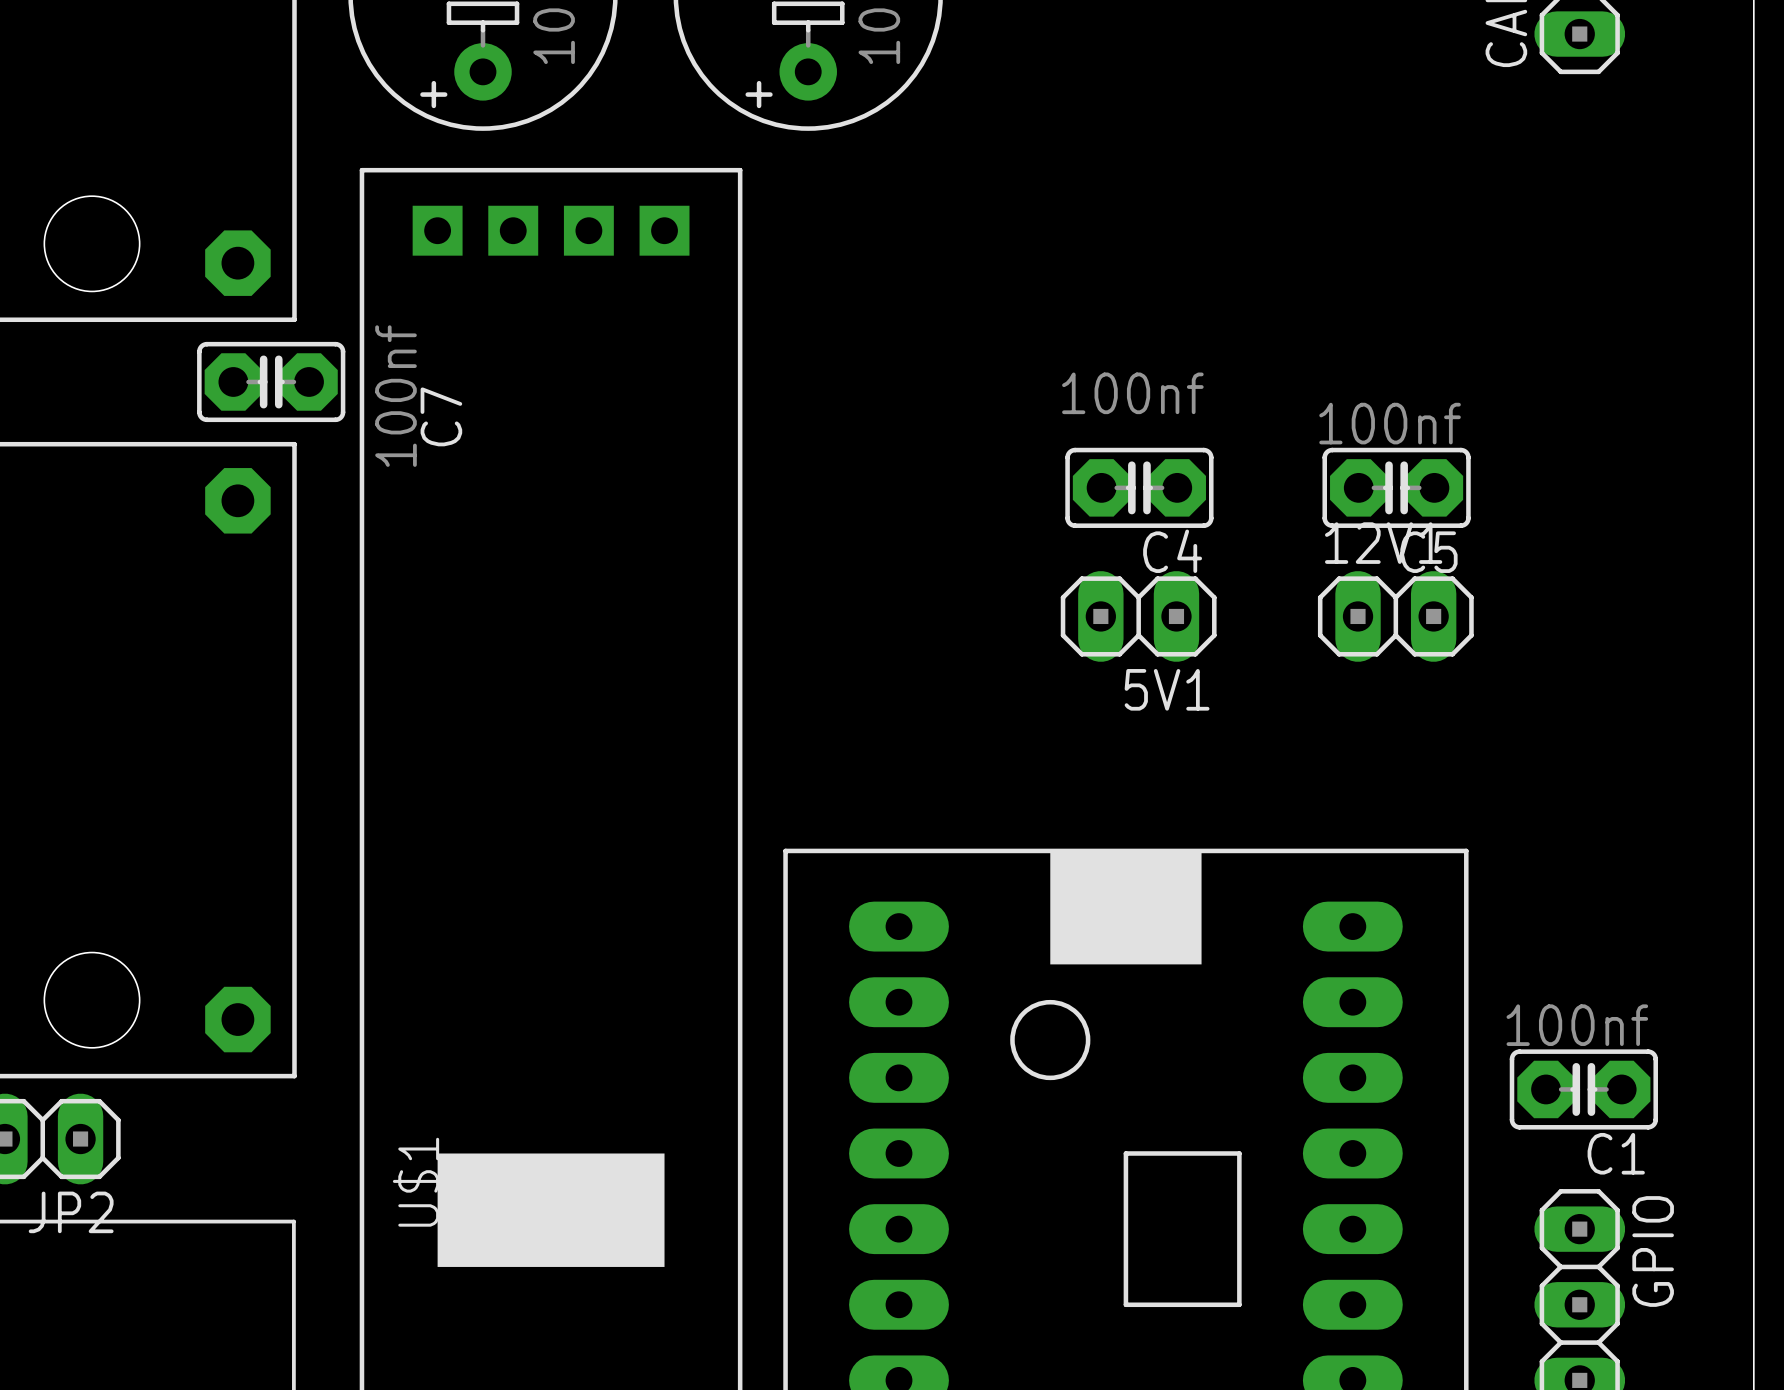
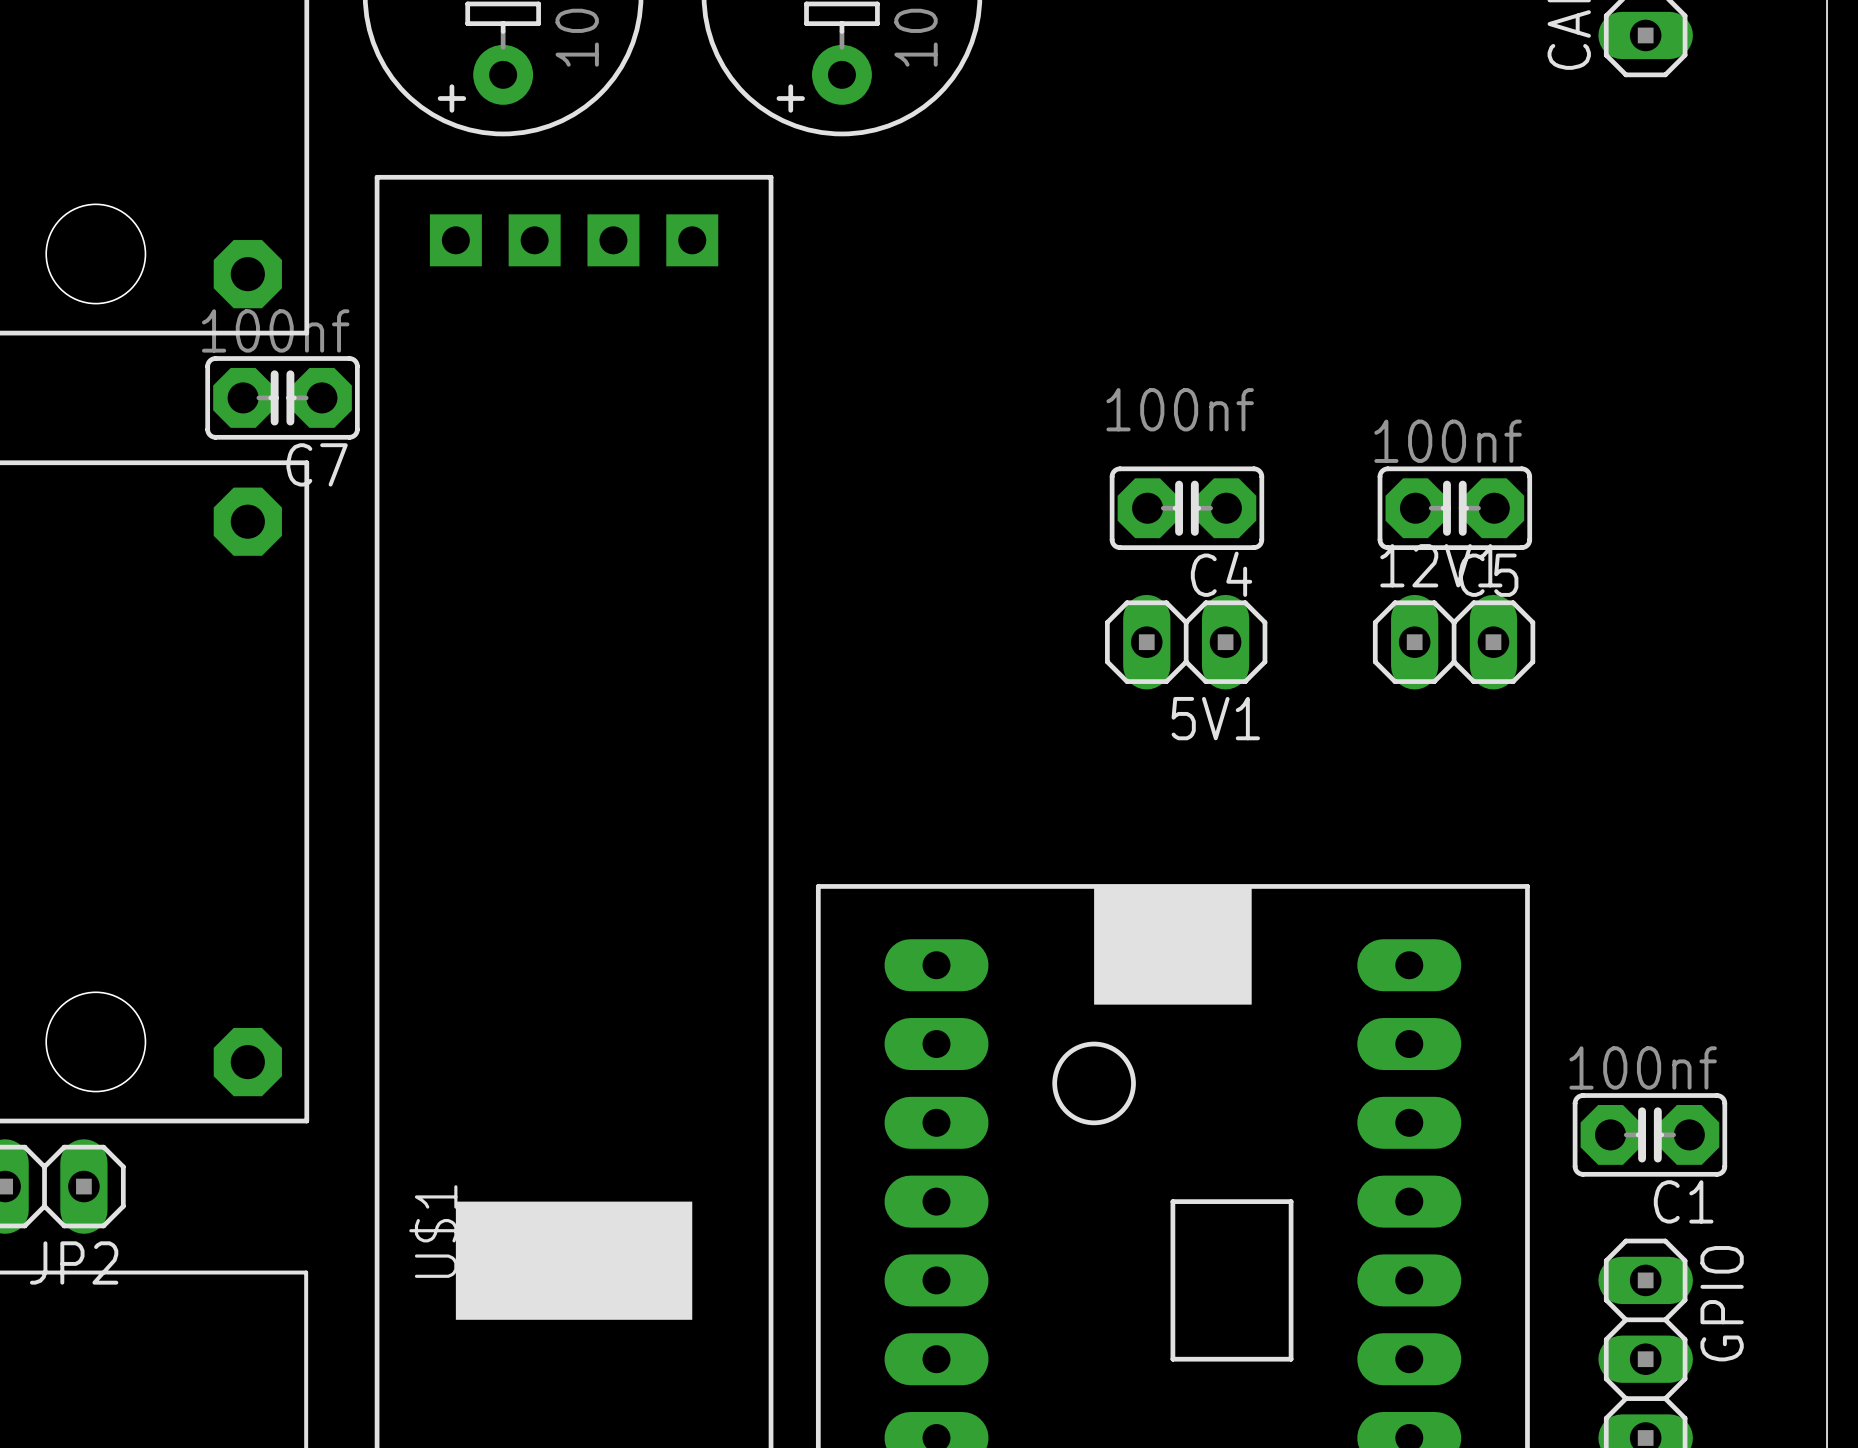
C7 value rotation: 0° (396, 396) -> 90° clockwise (275, 330)
C7 name rotation: 0° (441, 416) -> 90° clockwise (317, 464)
C7 name position: C7 (441, 416) -> C7 (317, 464)

